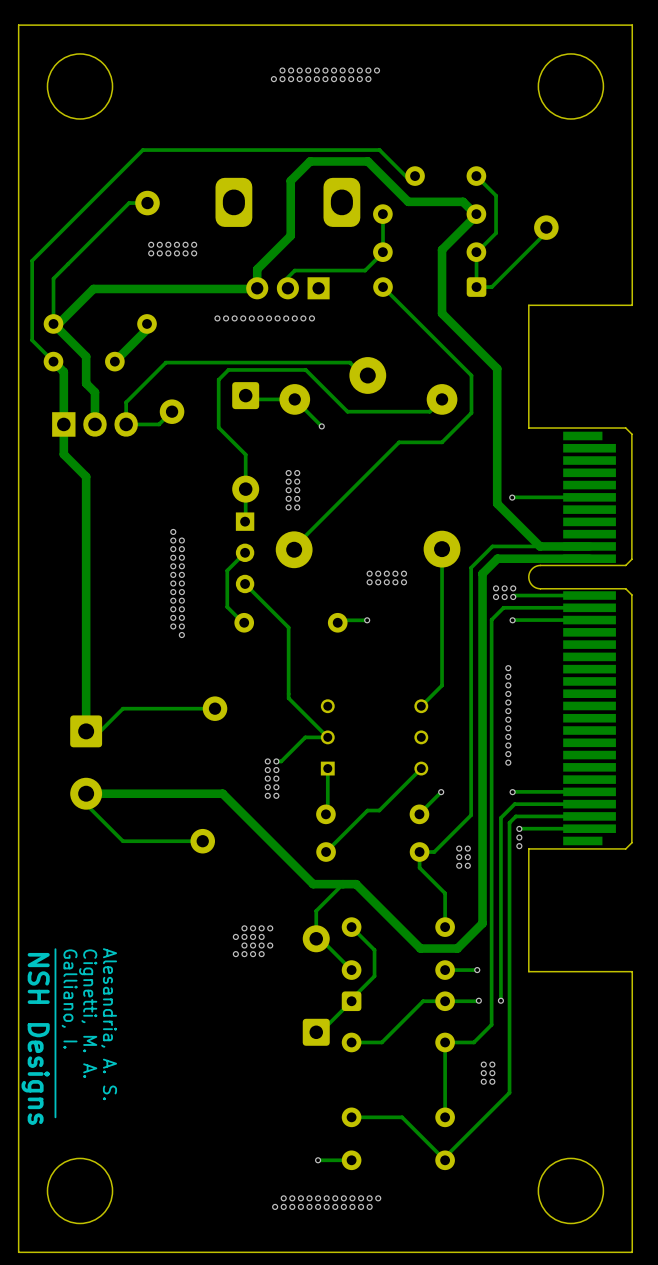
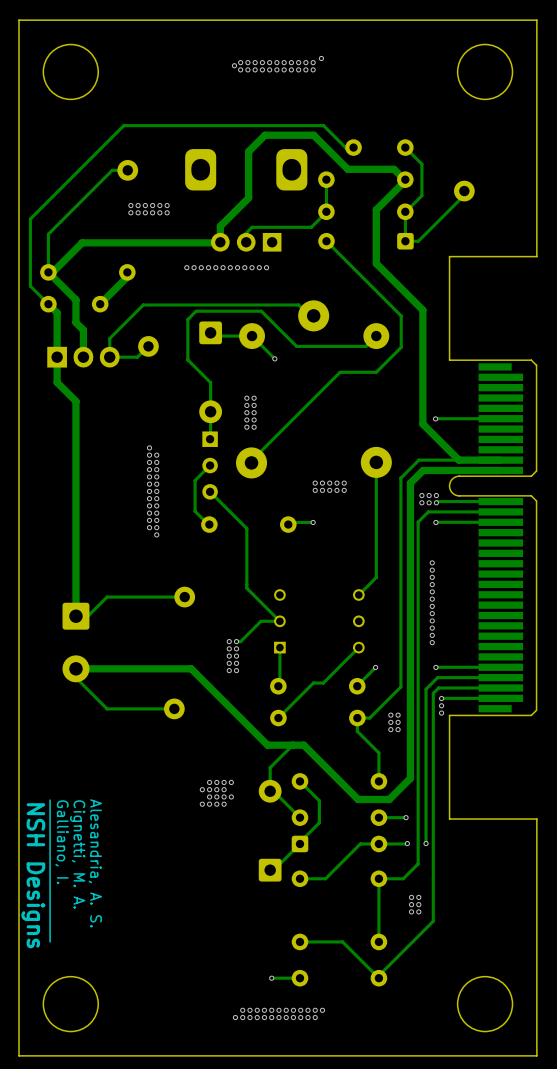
via: (282, 70) -> none
via: (291, 70) -> none
via: (299, 70) -> none
via: (308, 70) -> none
via: (316, 70) -> none
via: (325, 70) -> none
via: (334, 70) -> none
via: (342, 70) -> none
via: (351, 70) -> none
via: (359, 70) -> none
via: (368, 70) -> none
via: none -> (240, 62)
via: none -> (247, 62)
via: none -> (255, 62)
via: none -> (262, 62)
via: none -> (269, 62)
via: none -> (276, 62)
via: none -> (284, 62)
via: none -> (291, 62)
via: none -> (298, 62)
via: none -> (305, 62)
via: none -> (313, 62)
via: (282, 79) -> none
via: (291, 79) -> none
via: (299, 79) -> none
via: (308, 79) -> none
via: (316, 79) -> none
via: (325, 79) -> none
via: (334, 79) -> none
via: (342, 79) -> none
via: (351, 79) -> none
via: (359, 79) -> none
via: (368, 79) -> none
via: none -> (240, 69)
via: none -> (247, 69)
via: none -> (255, 69)
via: none -> (262, 69)
via: none -> (269, 69)
via: none -> (276, 69)
via: none -> (284, 69)
via: none -> (291, 69)
via: none -> (298, 69)
via: none -> (305, 69)
via: none -> (313, 69)

